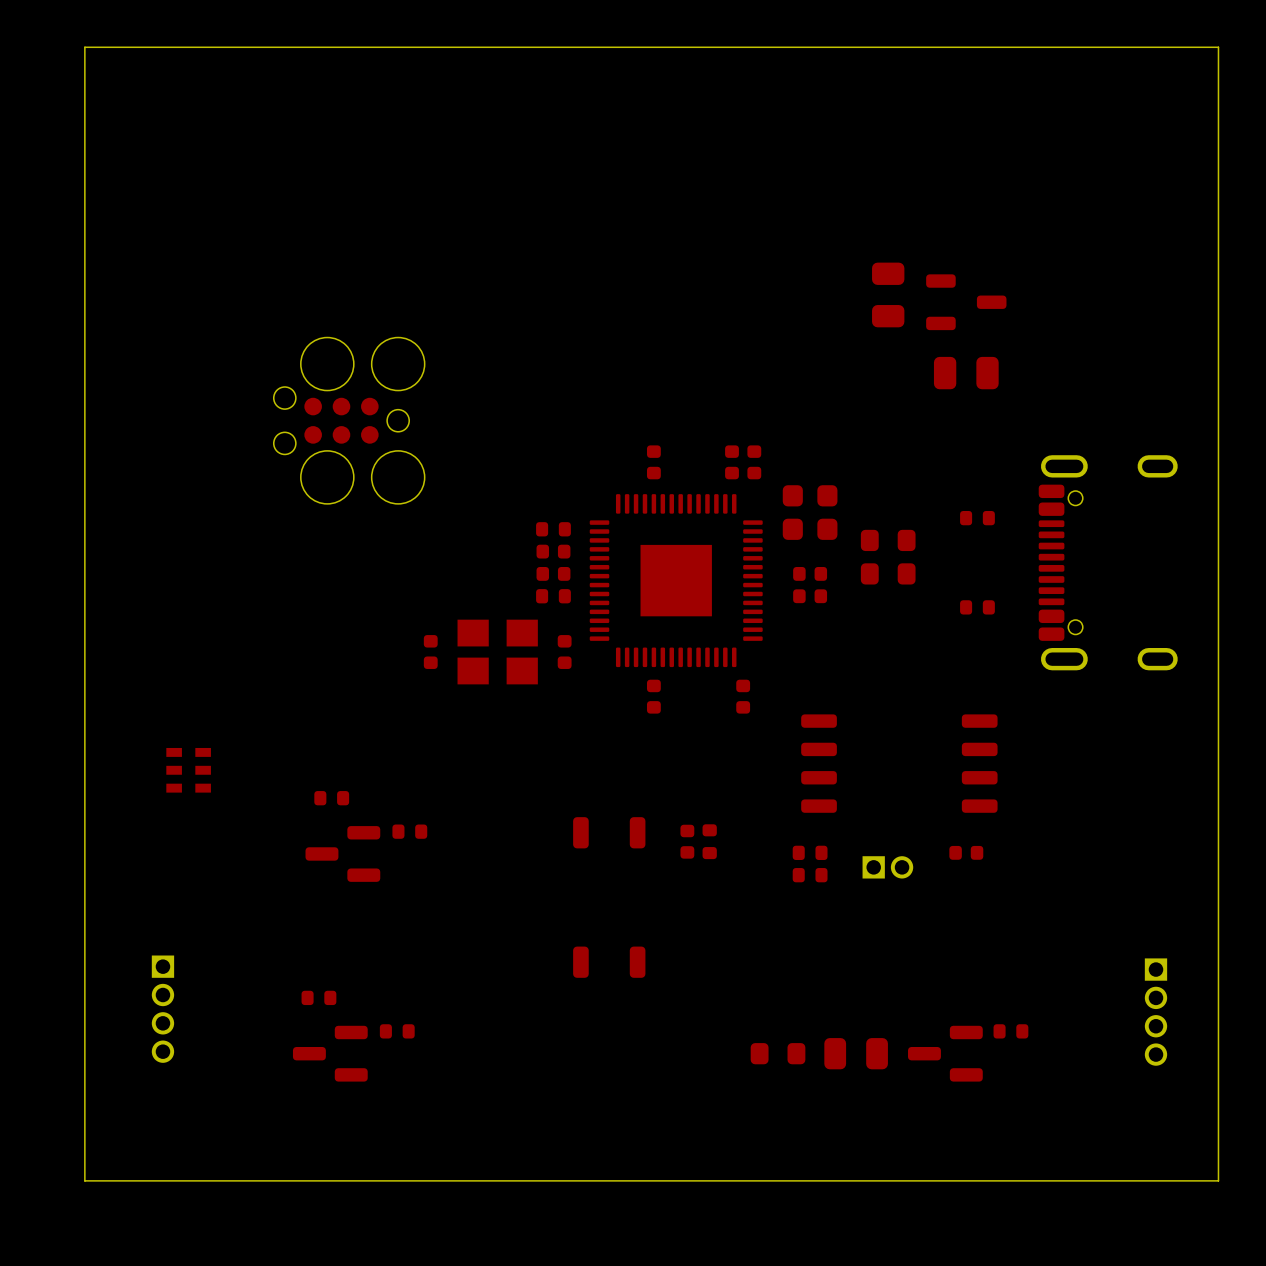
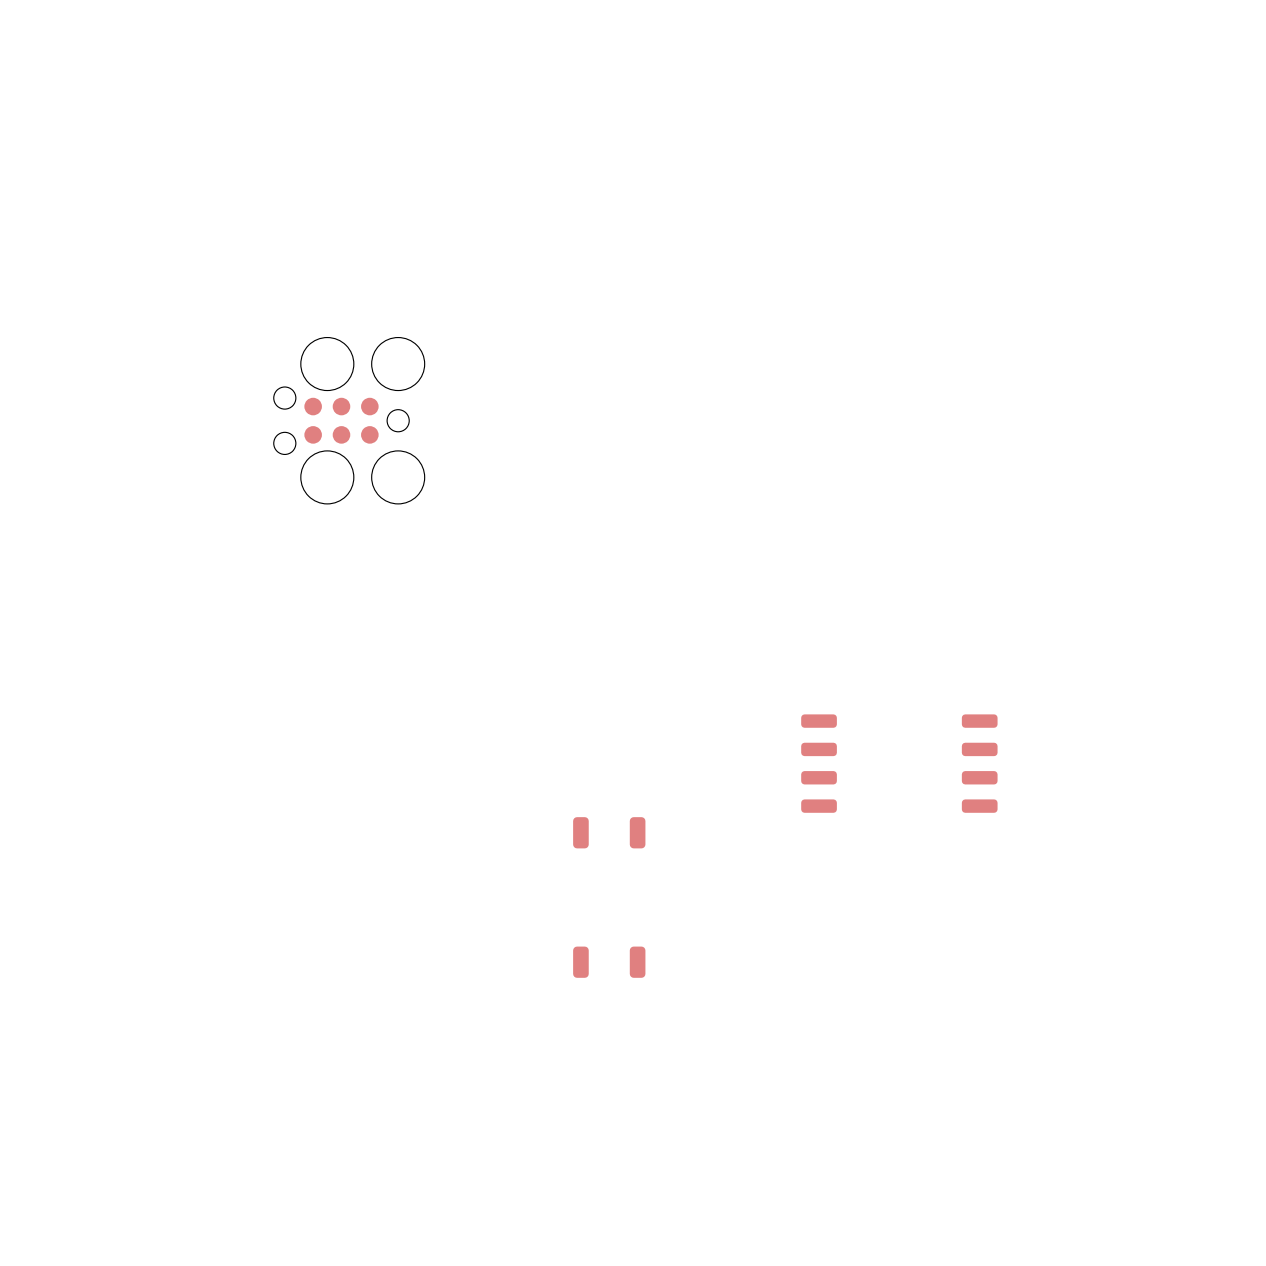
board edge: (1218, 47) (1218, 1180) (84, 1180) (84, 47) (1218, 47) -> none
part: (888, 294) -> none
part: (966, 302) -> none
part: (966, 373) -> none
part: (653, 462) -> none
part: (732, 462) -> none
part: (754, 462) -> none
part: (810, 495) -> none
part: (977, 518) -> none
part: (553, 529) -> none
part: (810, 529) -> none
part: (888, 540) -> none
part: (553, 551) -> none
part: (1108, 562) -> none
part: (553, 573) -> none
part: (810, 573) -> none
part: (888, 573) -> none
part: (676, 580) -> none
part: (553, 596) -> none
part: (810, 596) -> none
part: (977, 607) -> none
part: (430, 652) -> none
part: (497, 652) -> none
part: (564, 652) -> none
part: (653, 696) -> none
part: (743, 696) -> none
part: (188, 770) -> none
part: (331, 798) -> none
part: (409, 831) -> none
part: (687, 841) -> none
part: (709, 841) -> none
part: (810, 852) -> none
part: (966, 852) -> none
part: (342, 853) -> none
part: (887, 867) -> none
part: (810, 875) -> none
part: (318, 997) -> none
part: (162, 1009) -> none
part: (1155, 1012) -> none
part: (397, 1031) -> none
part: (1010, 1031) -> none
part: (330, 1053) -> none
part: (778, 1053) -> none
part: (856, 1053) -> none
part: (945, 1053) -> none

